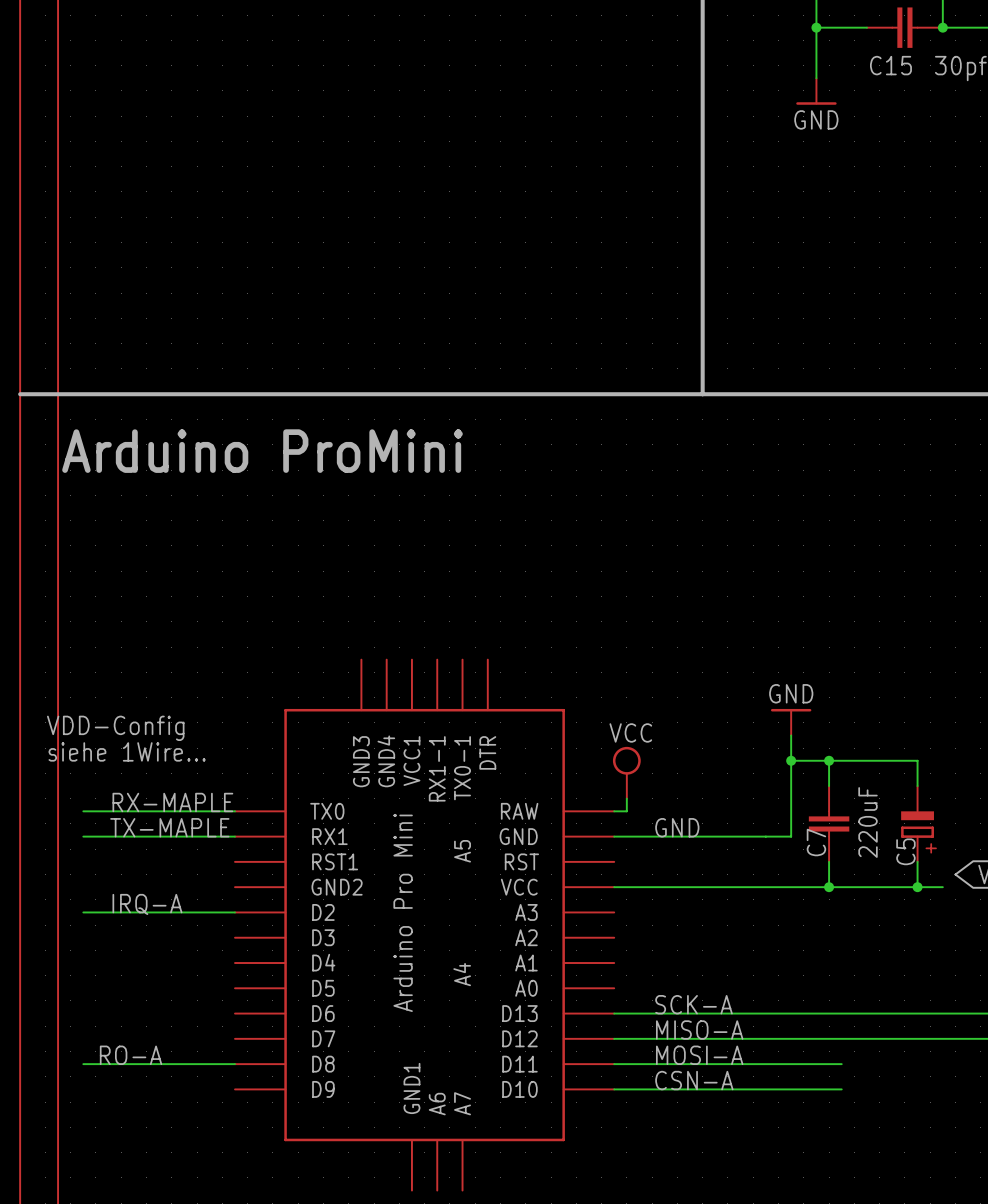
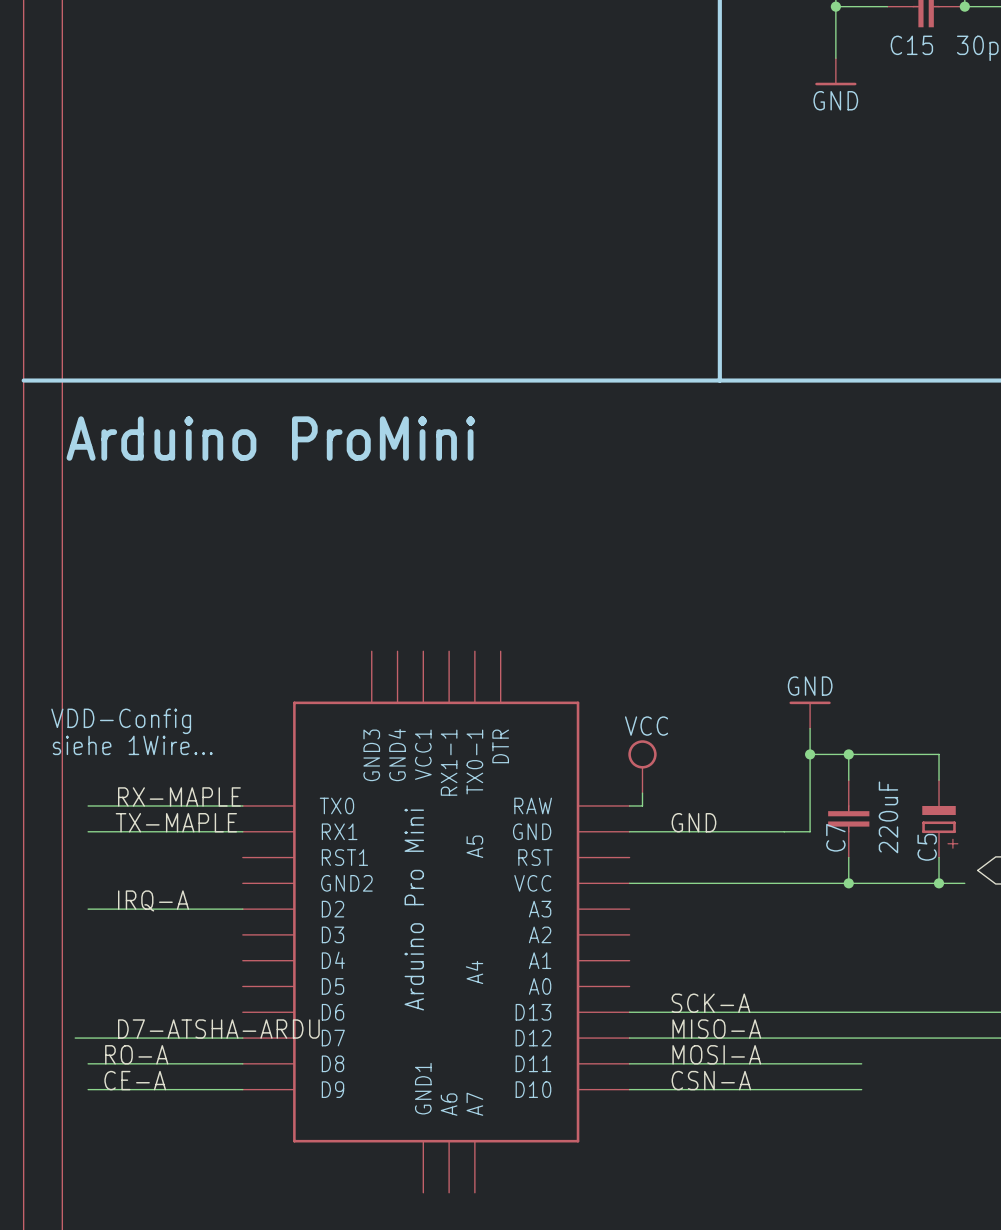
label: none -> D7-ATSHA-ARDU (218, 1029)
wire: none -> (75, 1038) (242, 1038)
label: none -> CE-A (135, 1080)
wire: none -> (88, 1089) (242, 1089)

